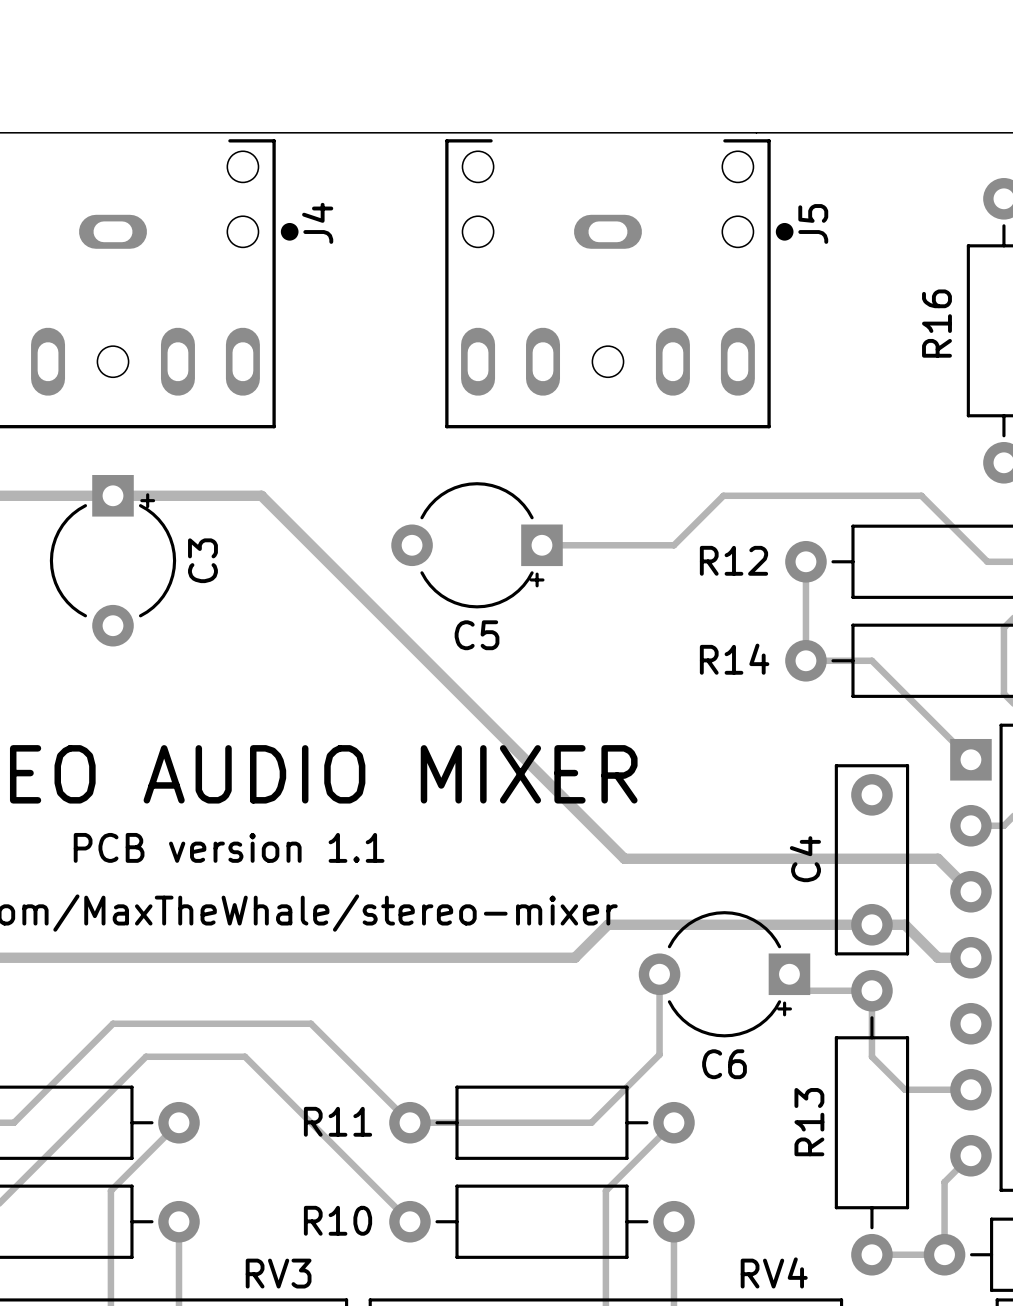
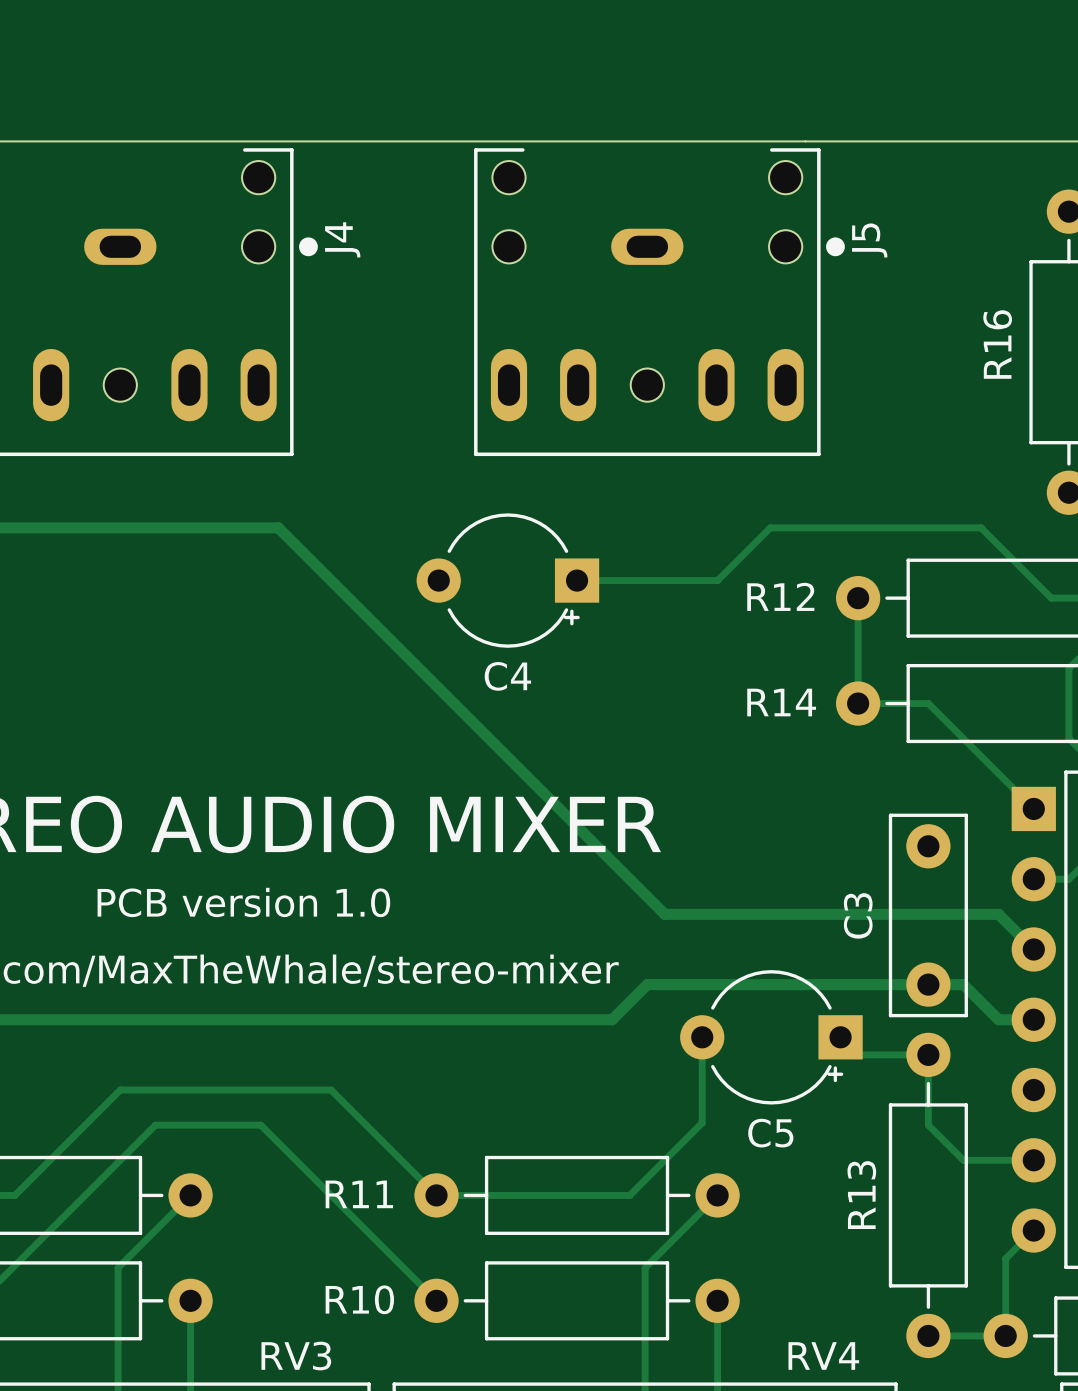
C3: (113, 560) -> none
C5 name: C5 (477, 635) -> C4 (507, 676)
text: PCB version 1.1 (229, 847) -> PCB version 1.0 (243, 902)
C4 name: C4 (805, 859) -> C3 (858, 915)
C6 name: C6 (724, 1064) -> C5 (770, 1133)

